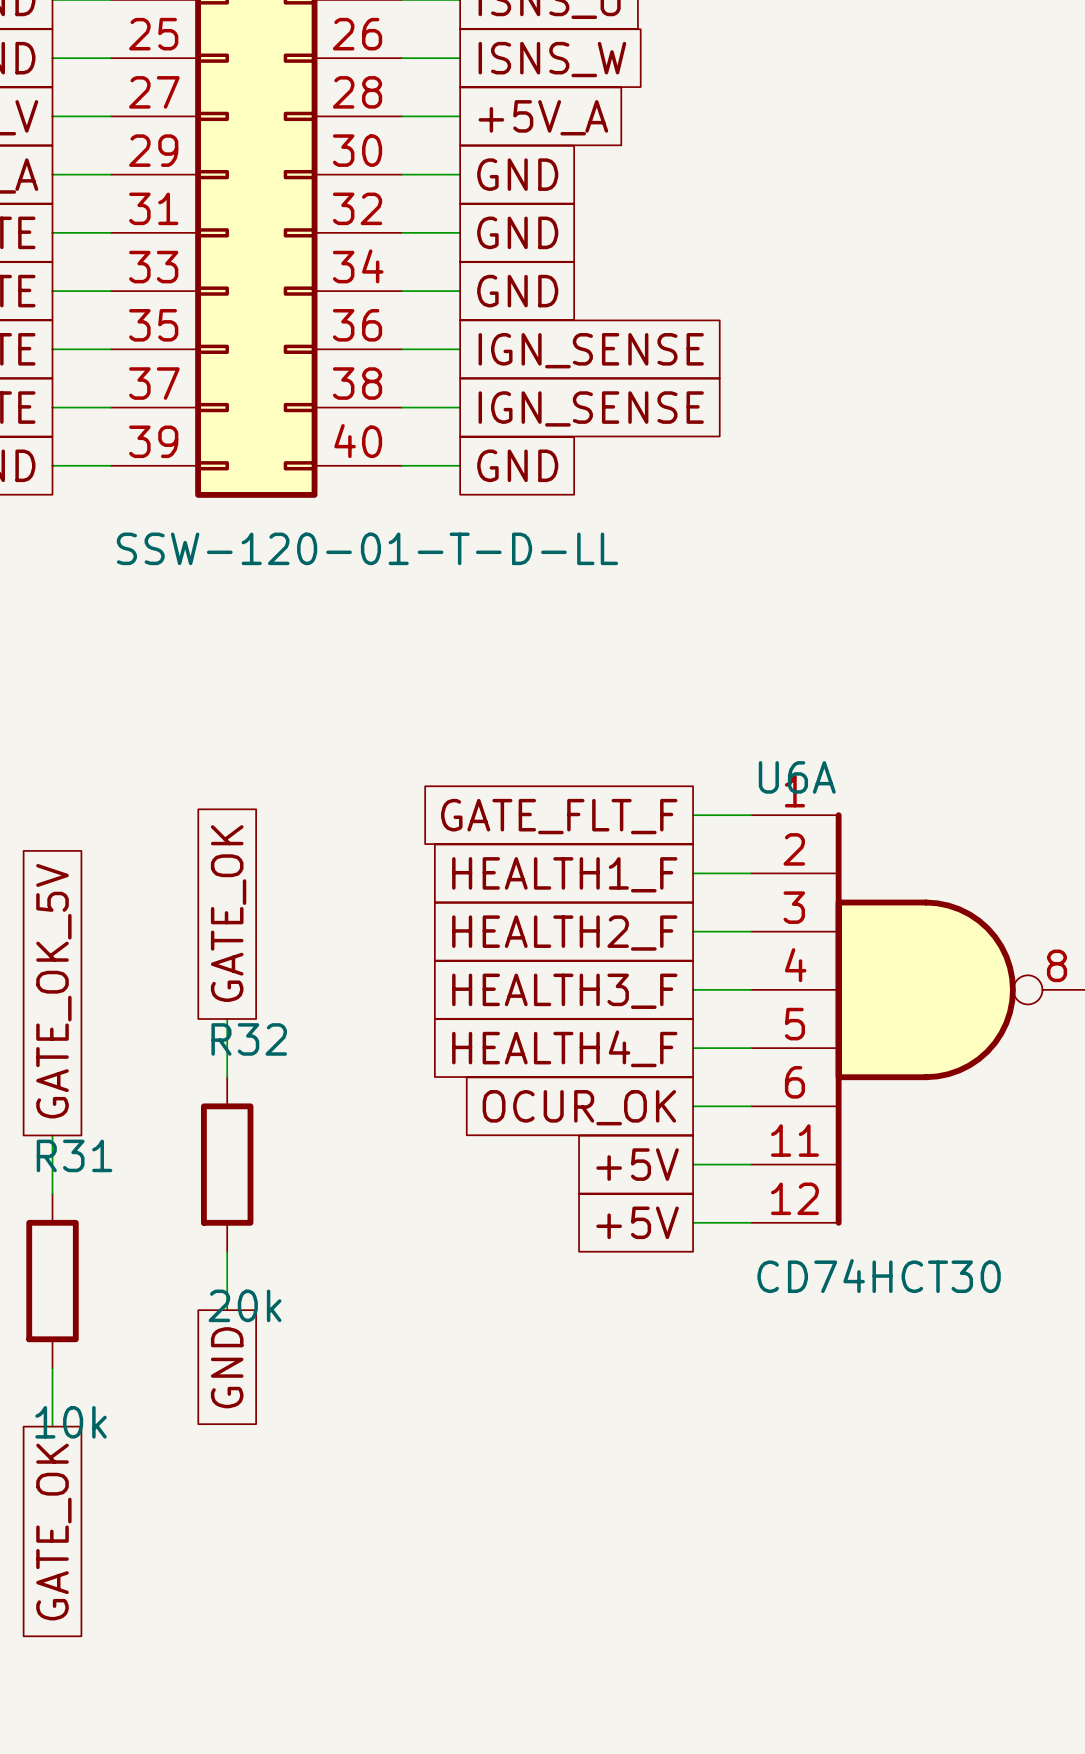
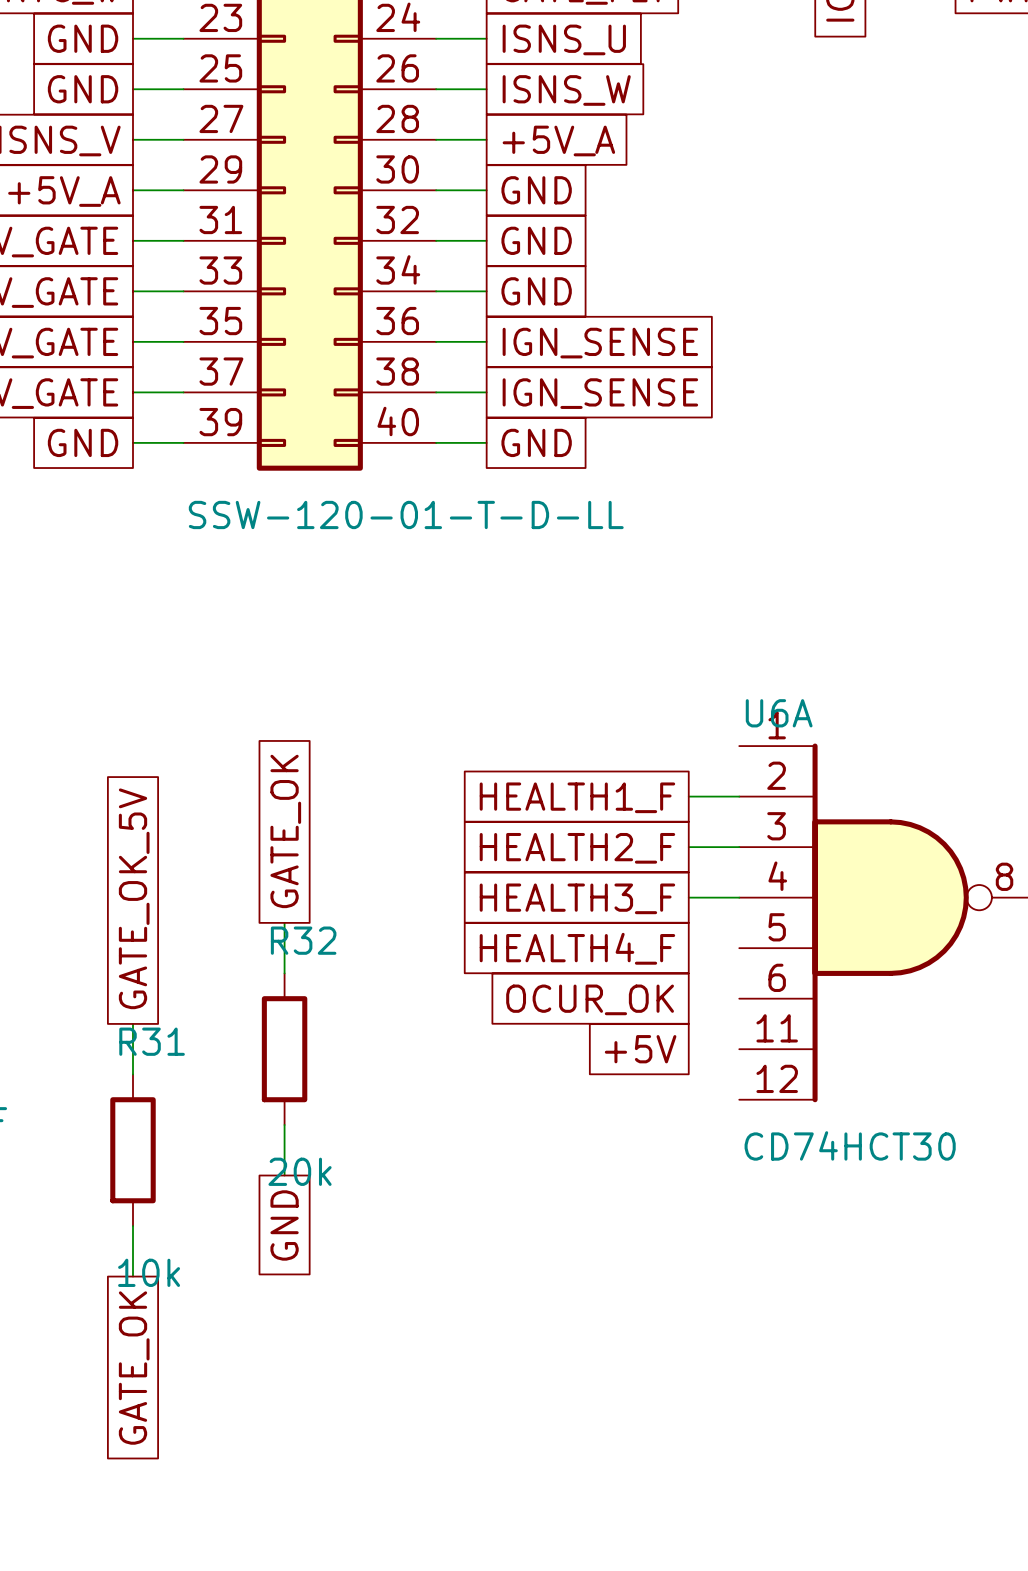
wire: (693, 815) (751, 815) -> none
global label: GATE_FLT_F (559, 816) -> none
wire: (693, 1048) (751, 1048) -> none
wire: (693, 1106) (751, 1106) -> none
wire: (693, 1164) (751, 1164) -> none
global label: +5V (637, 1222) -> none
wire: (693, 1222) (751, 1222) -> none

